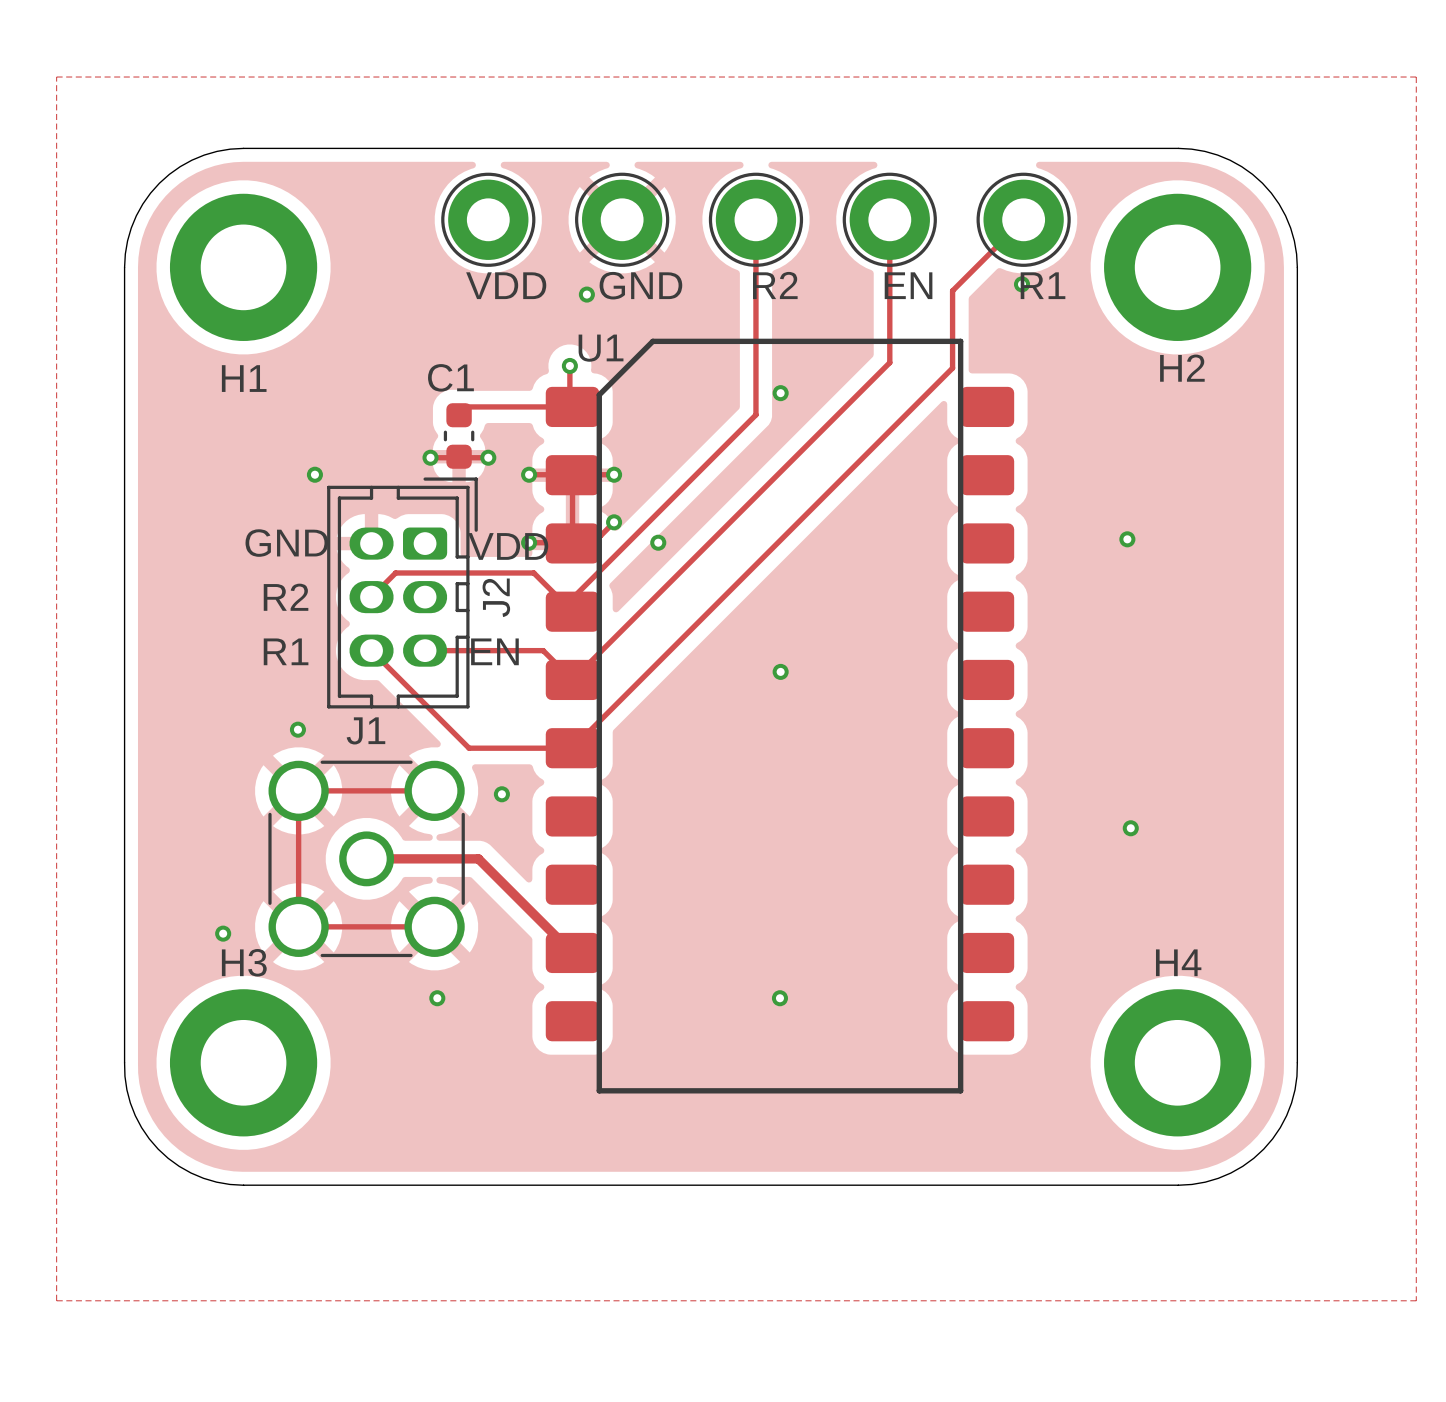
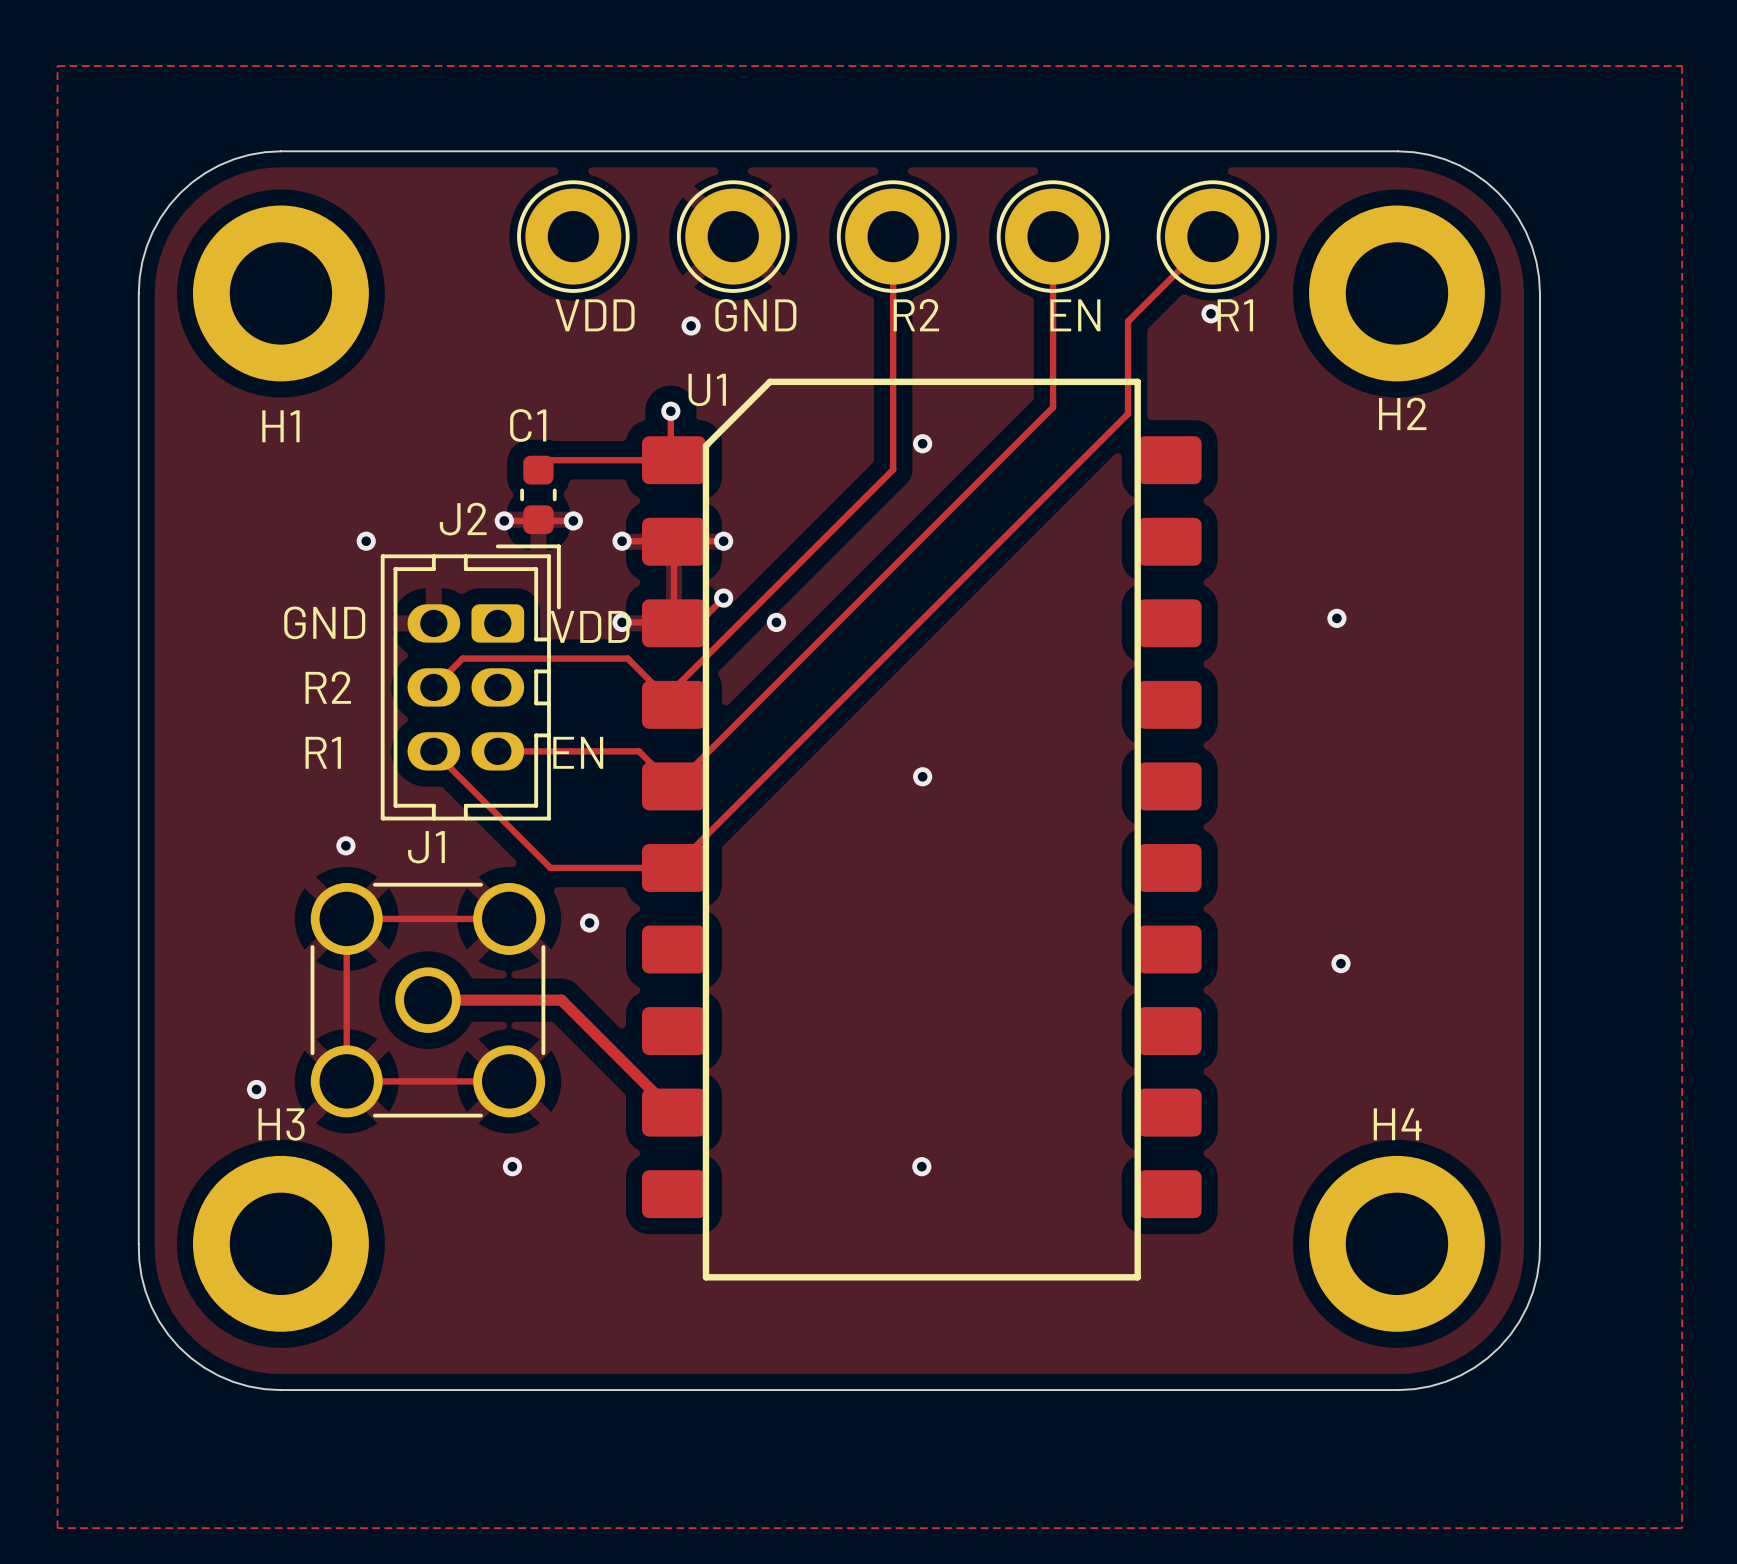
J2 name rotation: 0° (496, 597) -> 90° clockwise (463, 519)
J2 name position: J2 (496, 597) -> J2 (463, 519)

